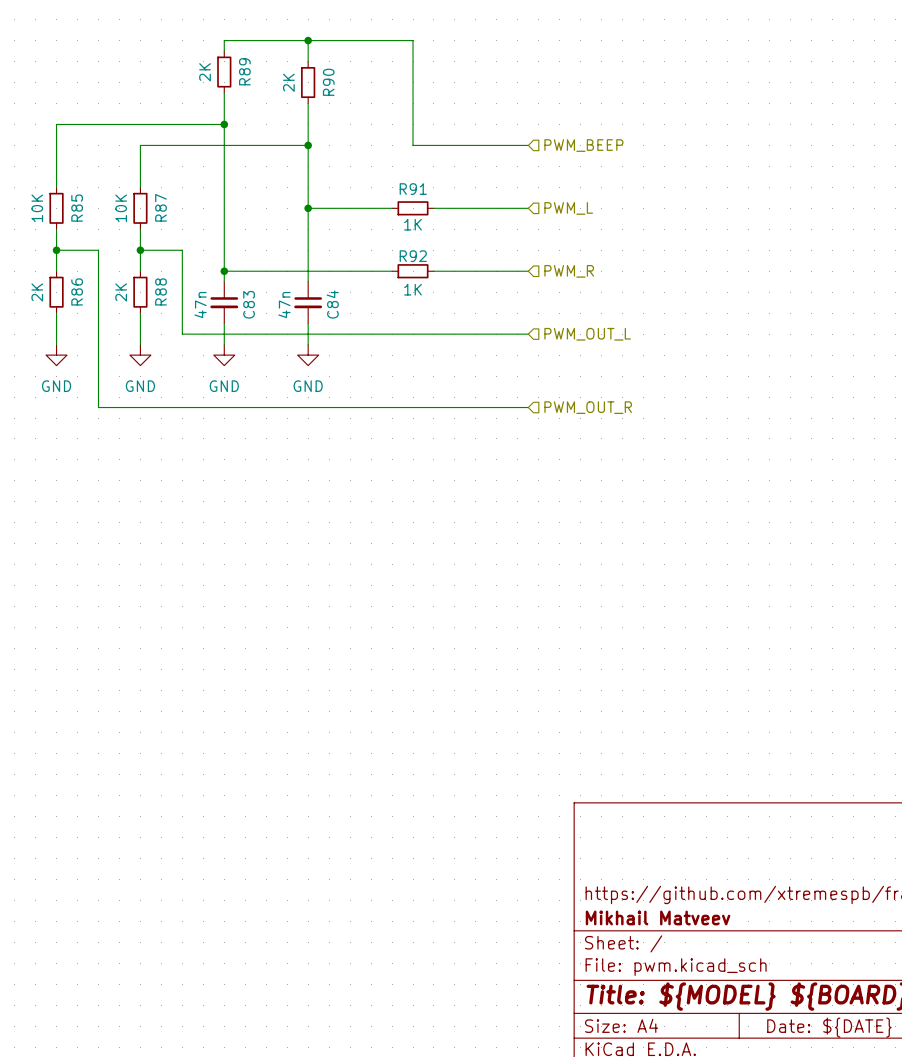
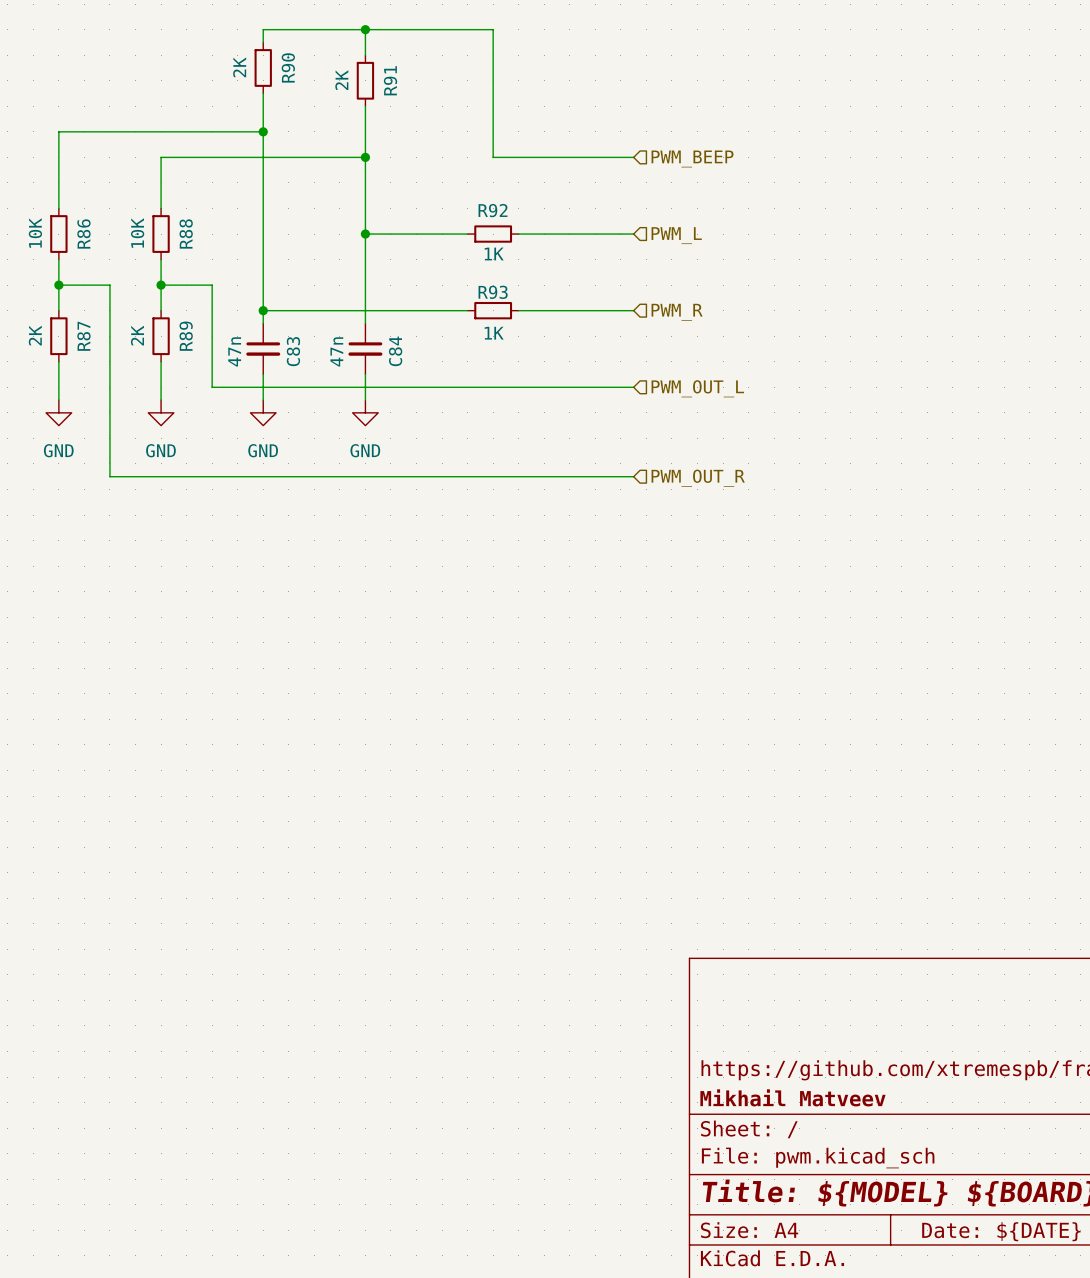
R89 name: R89 (244, 71) -> R90 (288, 67)
R90 name: R90 (328, 82) -> R91 (390, 80)
R91 name: R91 (413, 189) -> R92 (493, 210)
R87 name: R87 (160, 207) -> R88 (186, 233)
R85 name: R85 (77, 208) -> R86 (83, 233)
R92 name: R92 (413, 256) -> R93 (493, 292)
R86 name: R86 (77, 291) -> R87 (83, 336)
R88 name: R88 (160, 291) -> R89 (186, 336)

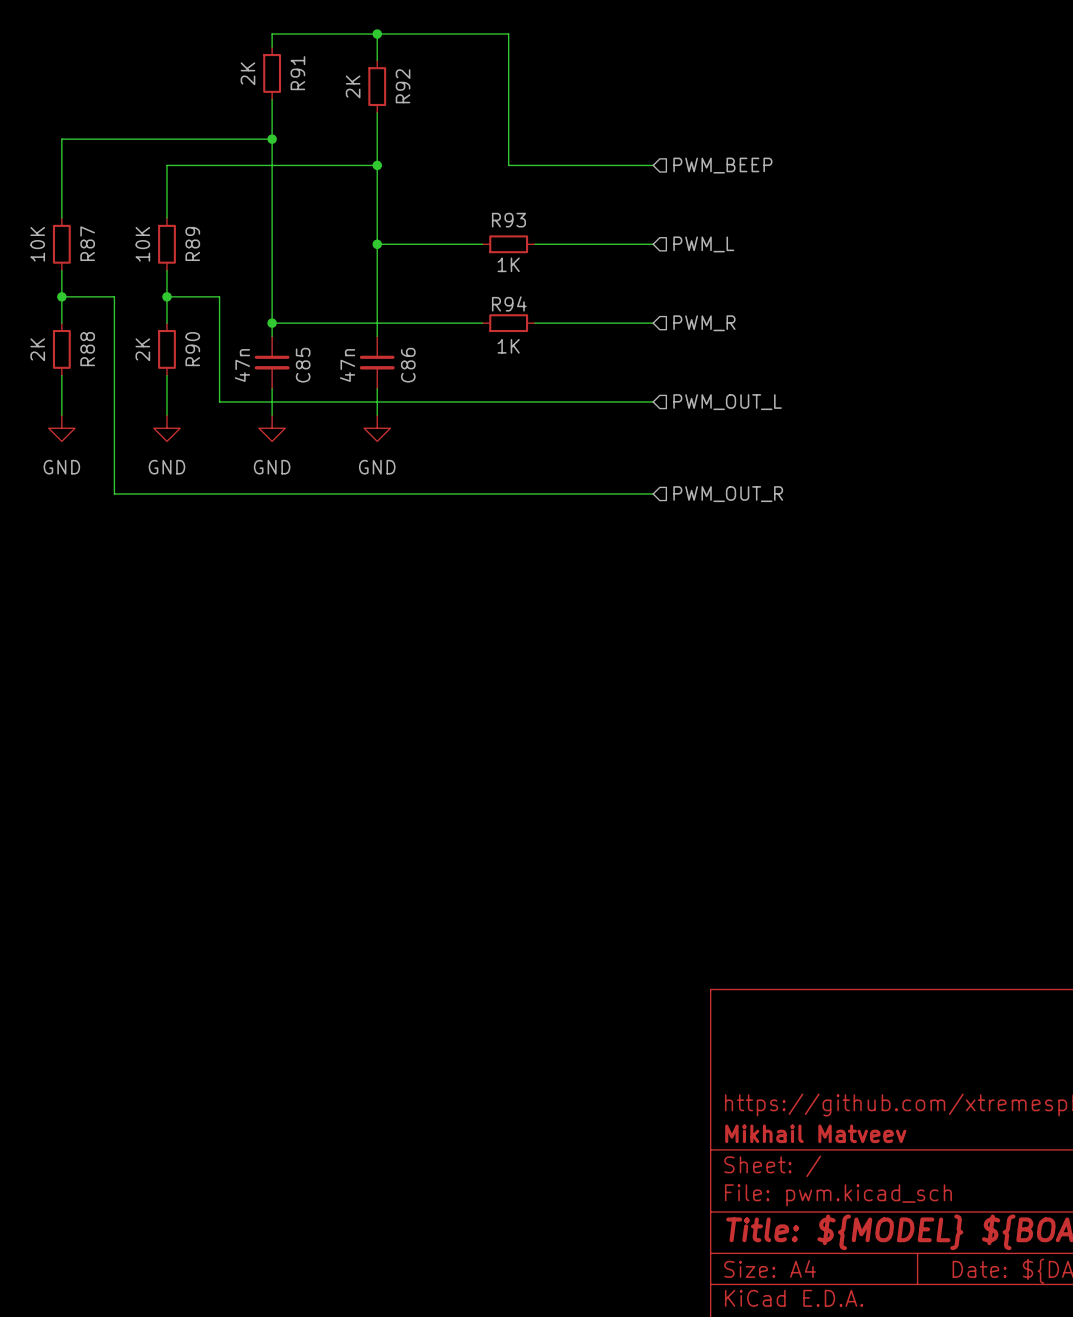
R90 name: R90 (288, 67) -> R91 (297, 73)
R91 name: R91 (390, 80) -> R92 (403, 86)
R92 name: R92 (493, 210) -> R93 (508, 220)
R86 name: R86 (83, 233) -> R87 (87, 243)
R88 name: R88 (186, 233) -> R89 (192, 243)
R93 name: R93 (493, 292) -> R94 (509, 303)
R87 name: R87 (83, 336) -> R88 (87, 349)
R89 name: R89 (186, 336) -> R90 (192, 349)
C83 name: C83 (293, 351) -> C85 (303, 365)
C84 name: C84 (395, 351) -> C86 (408, 365)

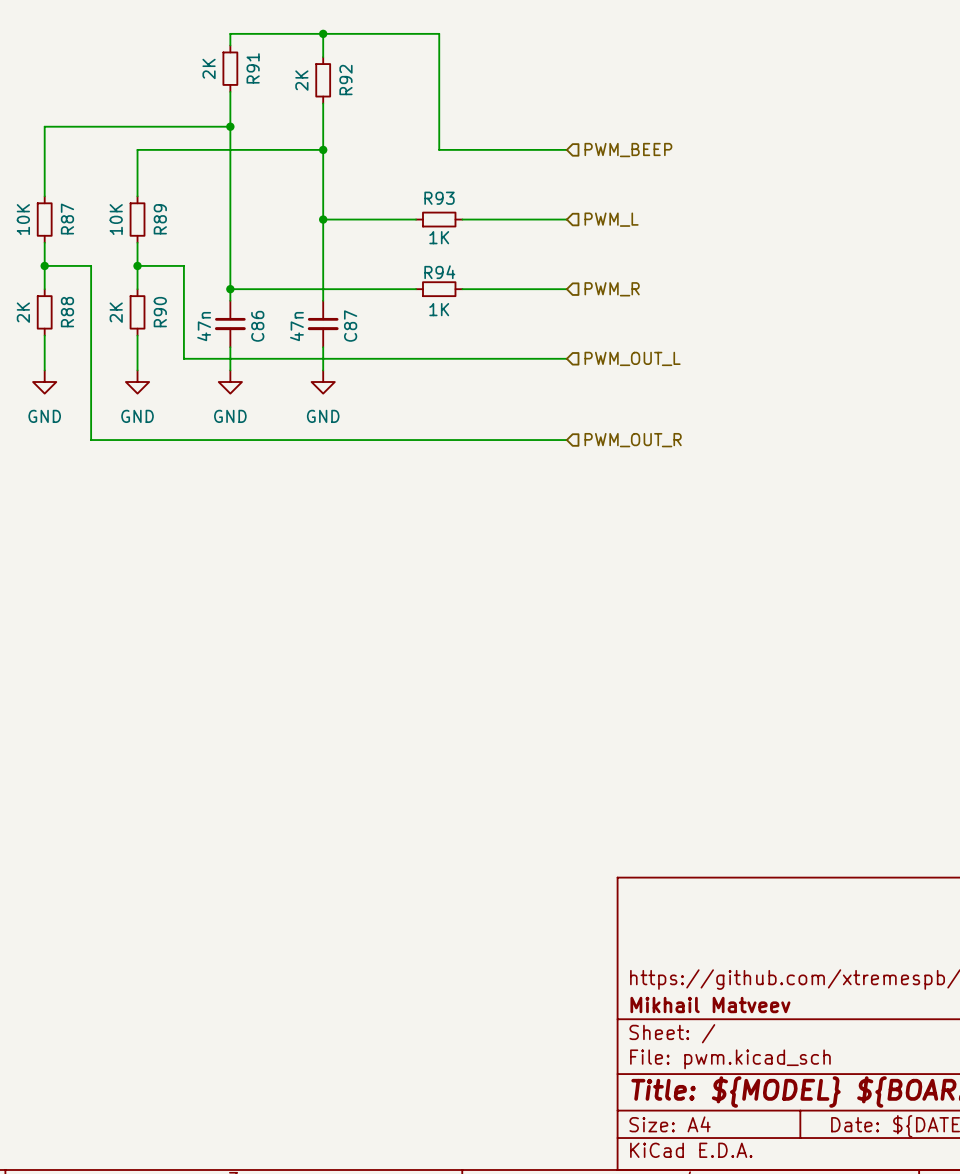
C85 name: C85 (303, 365) -> C86 (257, 326)
C86 name: C86 (408, 365) -> C87 (350, 326)

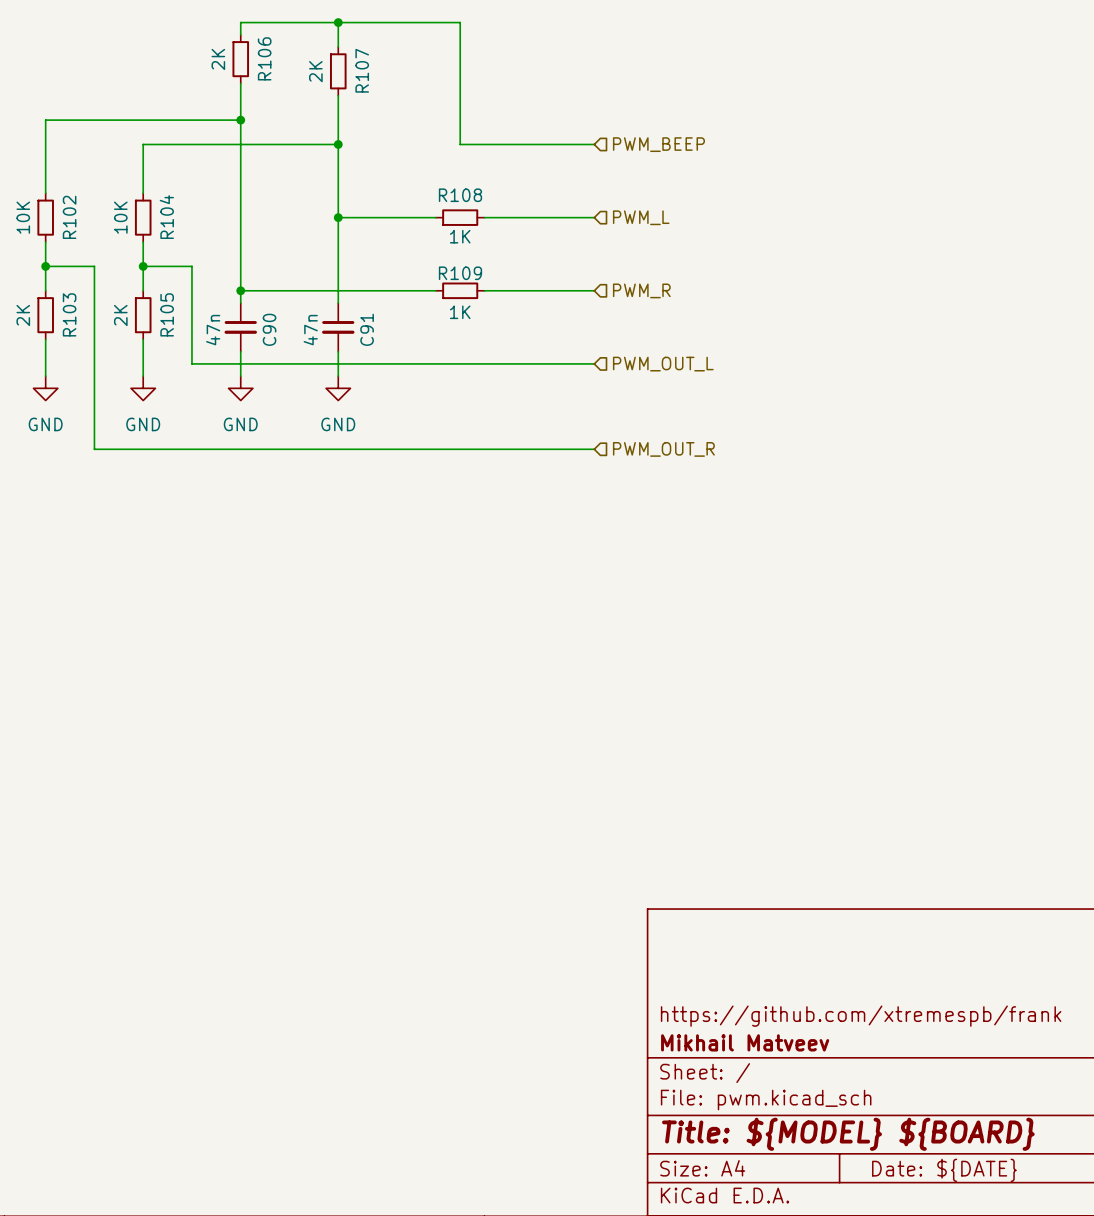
R91 name: R91 (253, 68) -> R106 (264, 58)
R92 name: R92 (345, 80) -> R107 (362, 70)
R93 name: R93 (439, 198) -> R108 (460, 195)
R87 name: R87 (67, 218) -> R102 (69, 217)
R89 name: R89 (160, 219) -> R104 (166, 217)
R94 name: R94 (439, 272) -> R109 (460, 273)
R88 name: R88 (67, 312) -> R103 (69, 314)
R90 name: R90 (160, 312) -> R105 (167, 314)
C86 name: C86 (257, 326) -> C90 (269, 329)
C87 name: C87 (350, 326) -> C91 (367, 329)

